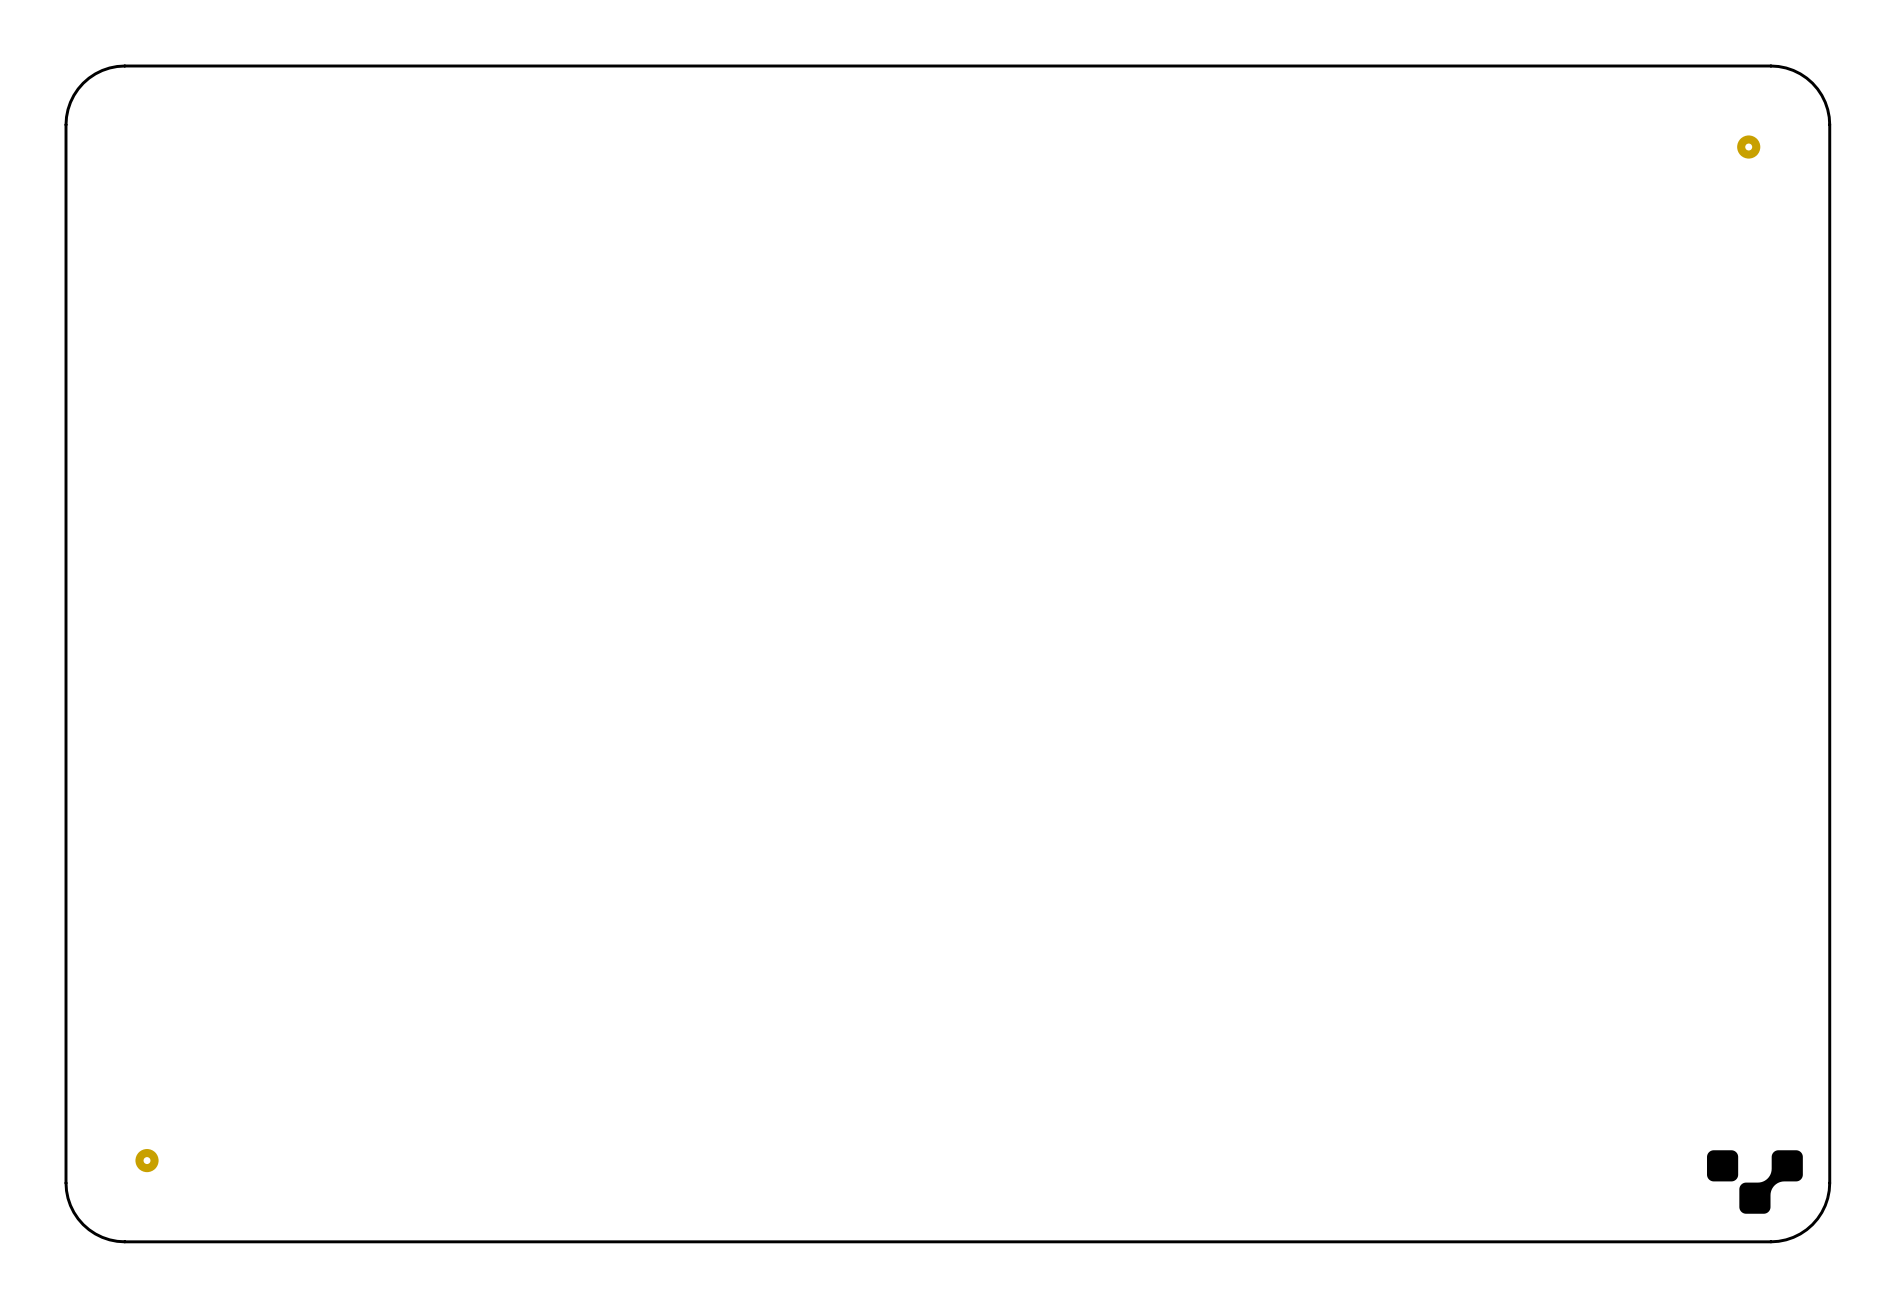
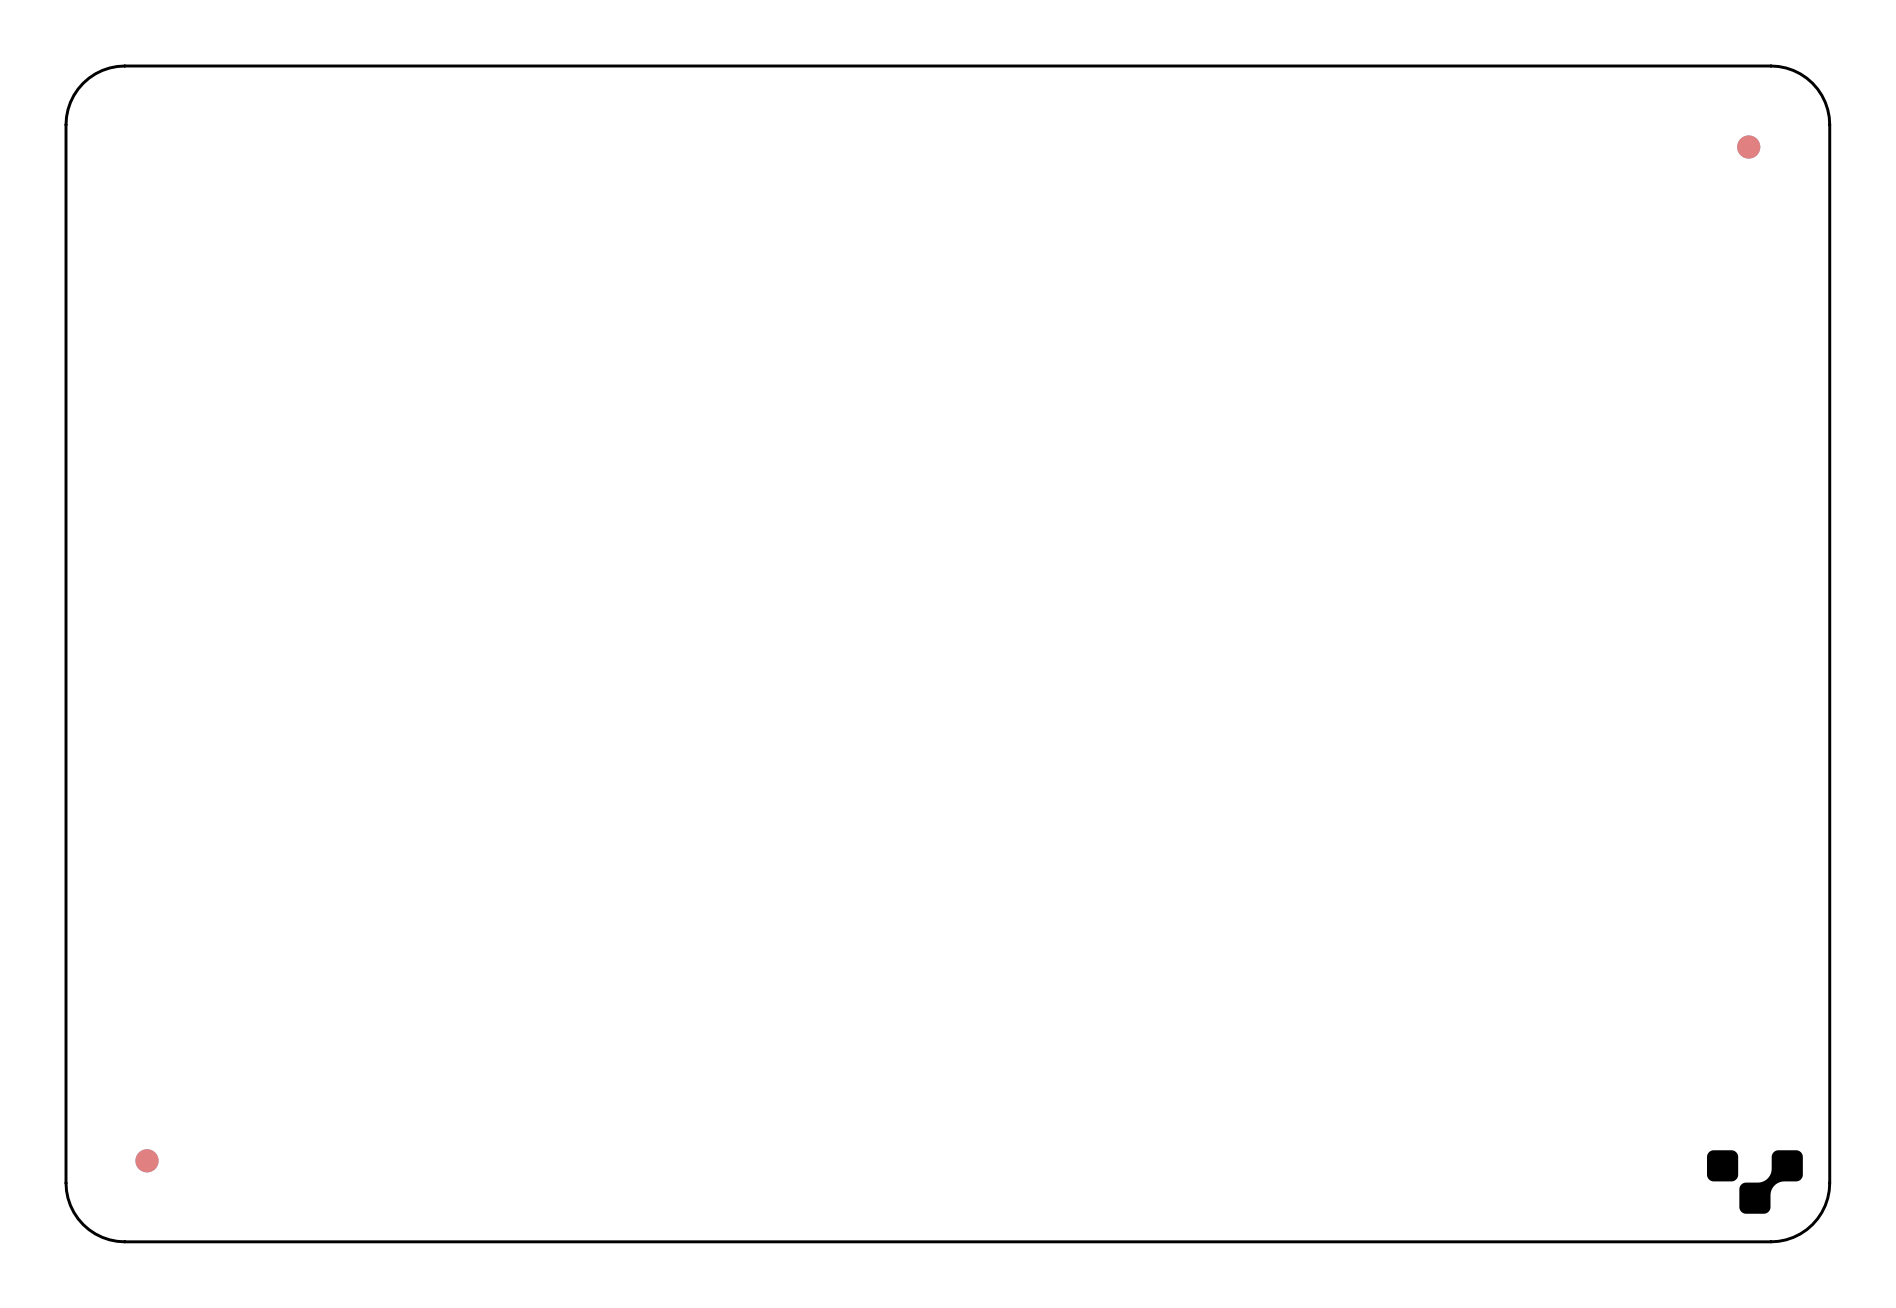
part footprint: [64, 64, 1832, 1244] -> [64, 64, 1832, 1244]

